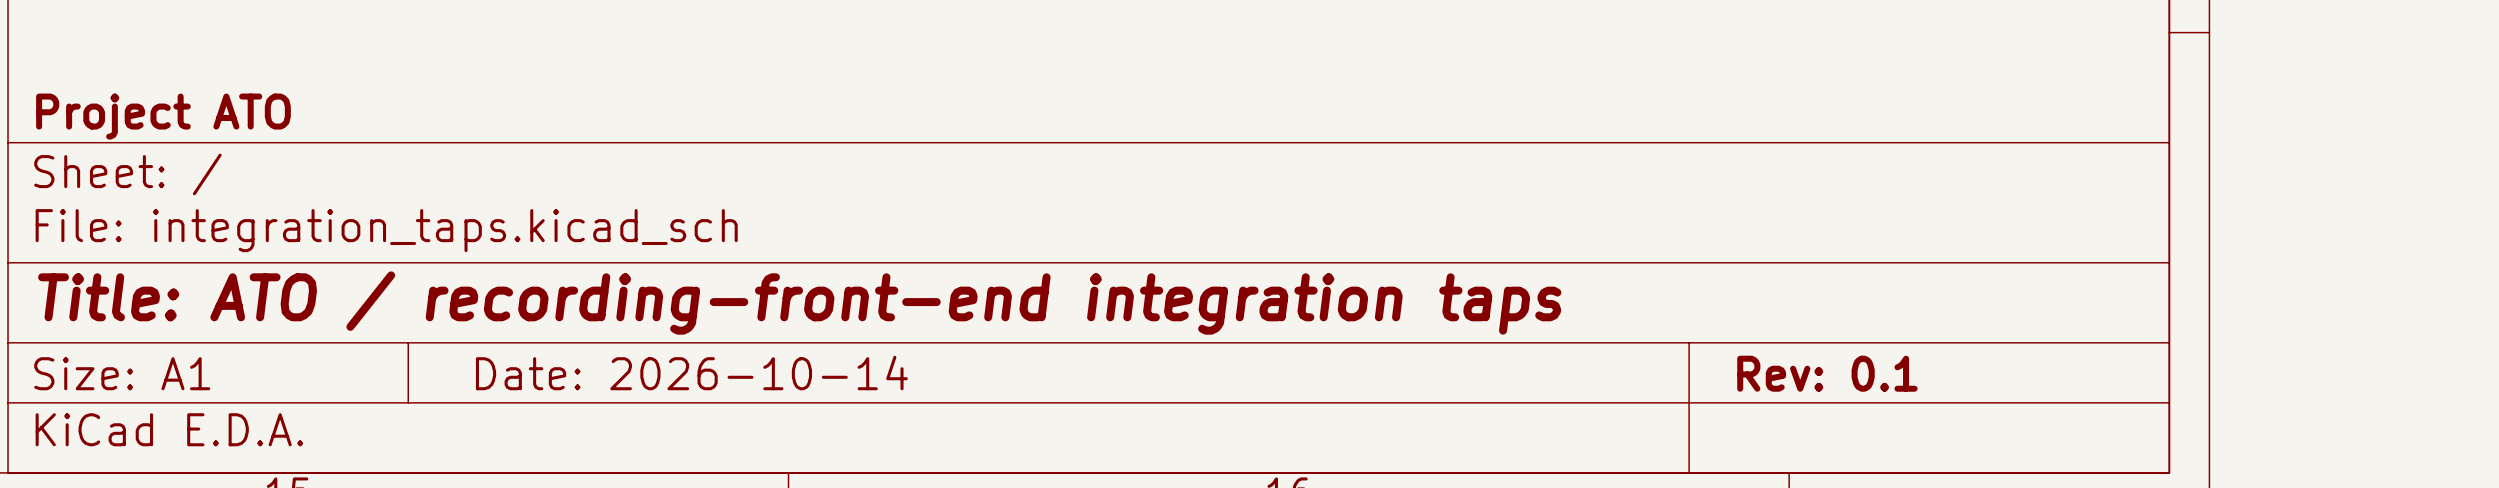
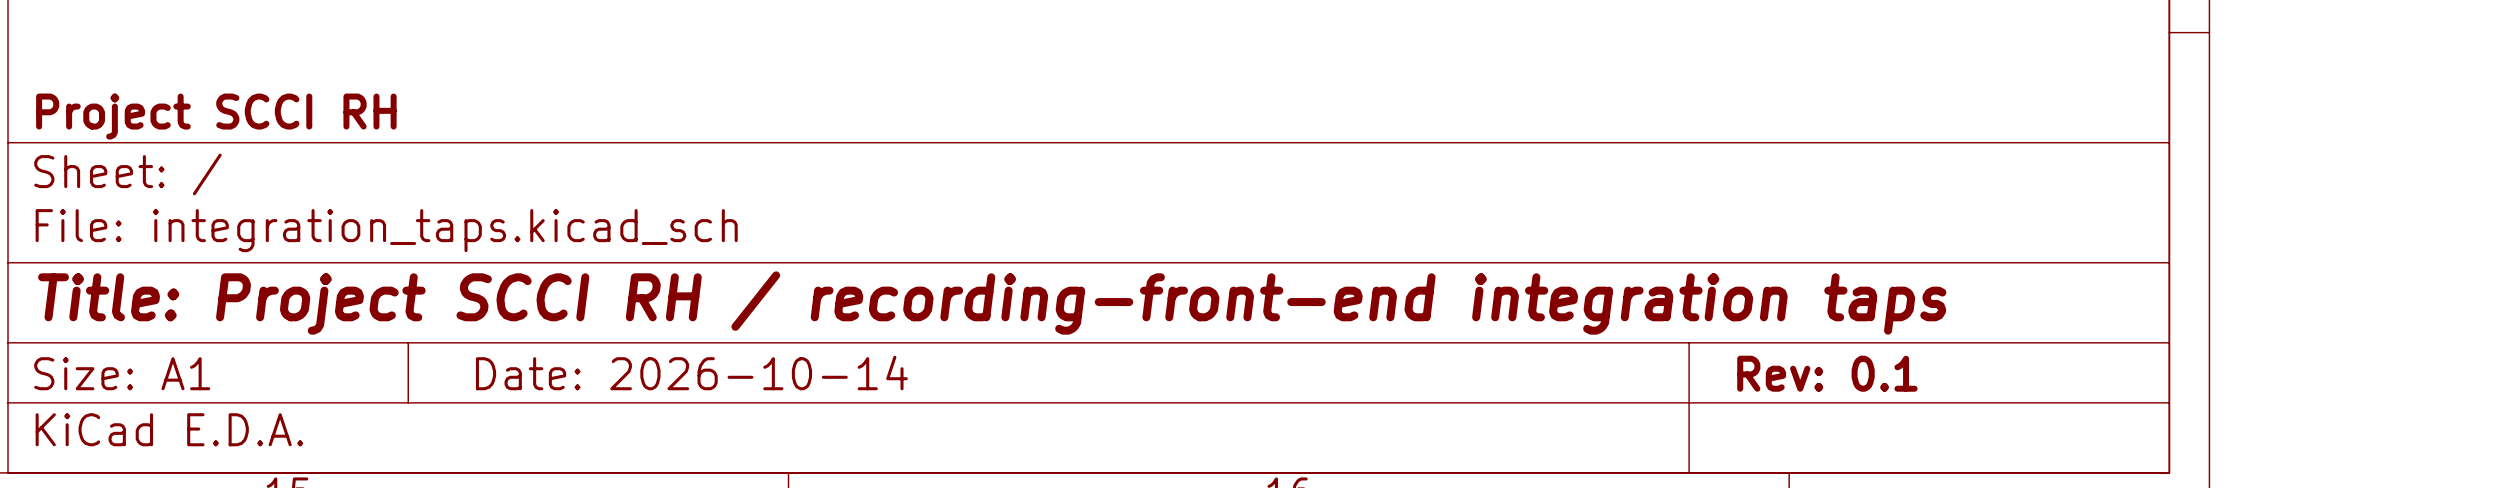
title block: Project ATO (163, 116) -> Project SCCI RH (216, 116)
title block: Title: ATO / recording-front-end integration taps (799, 303) -> Title: Project SCCI RH / recording-front-end integration taps (992, 303)

